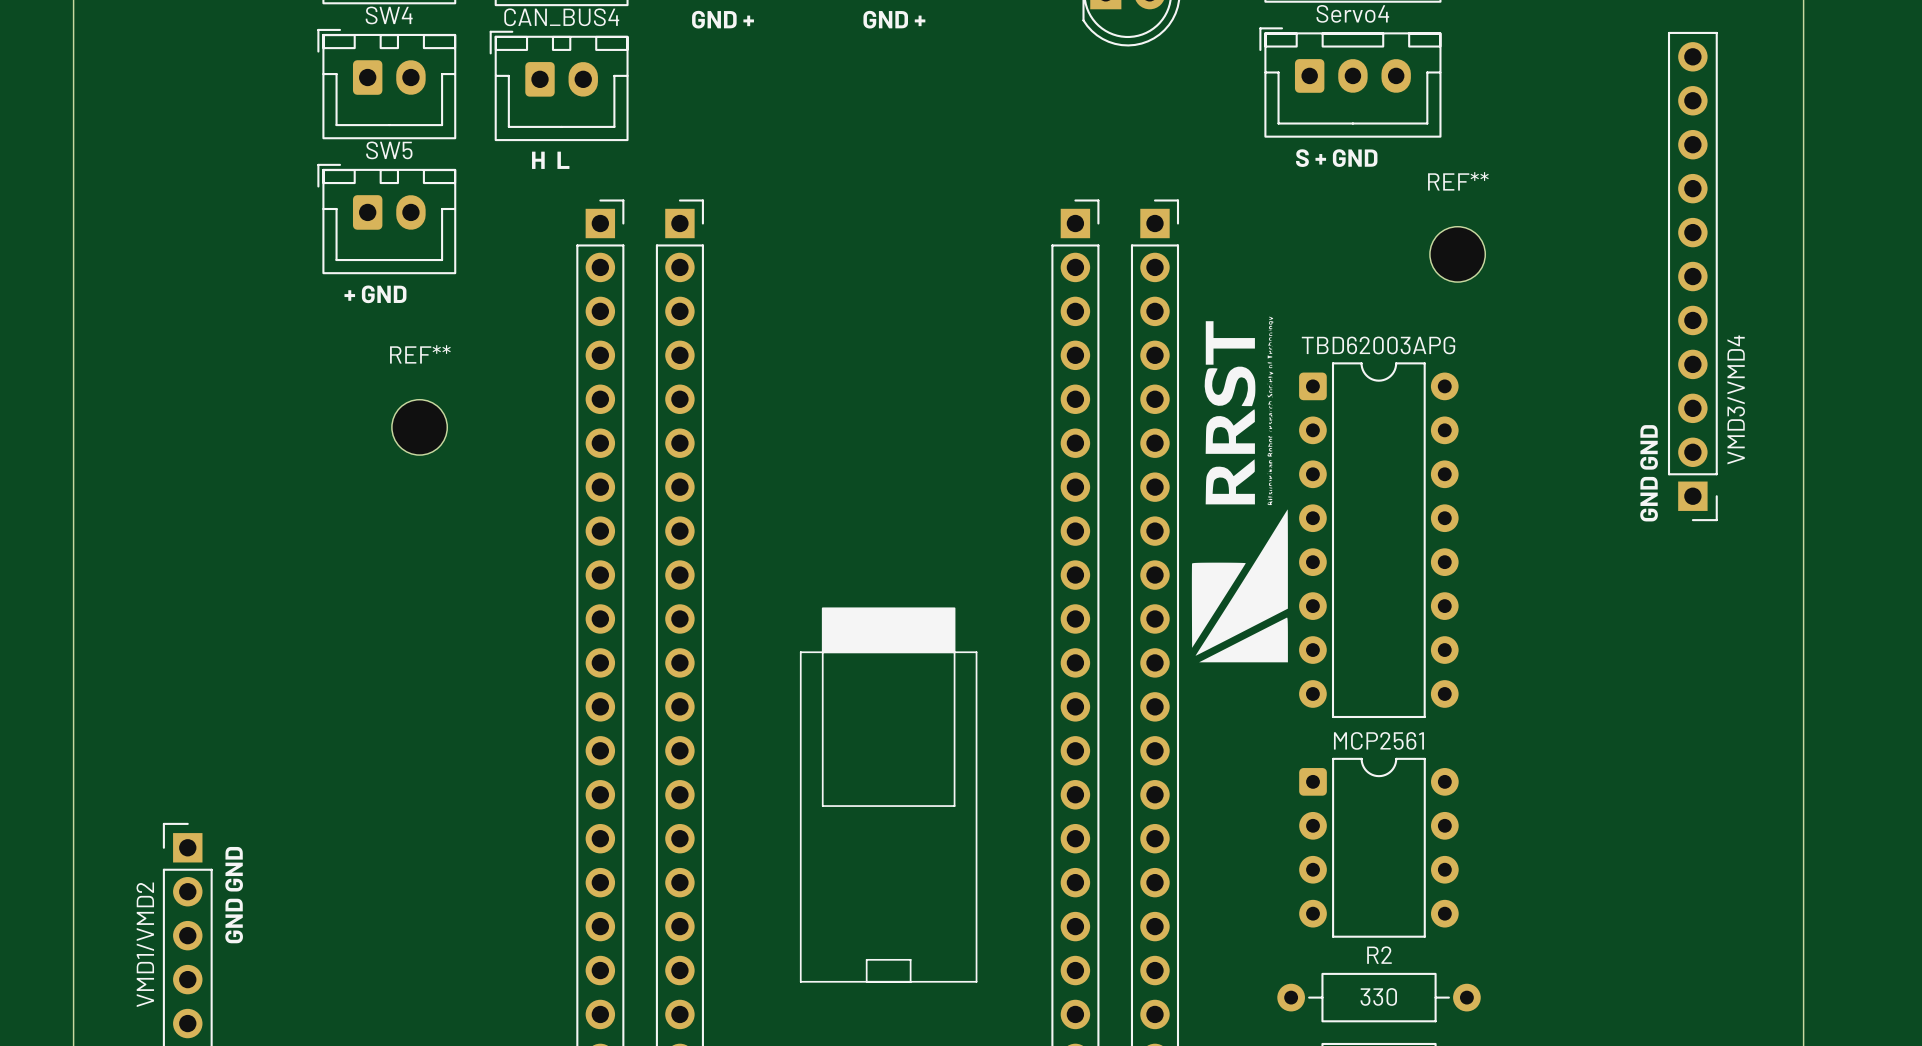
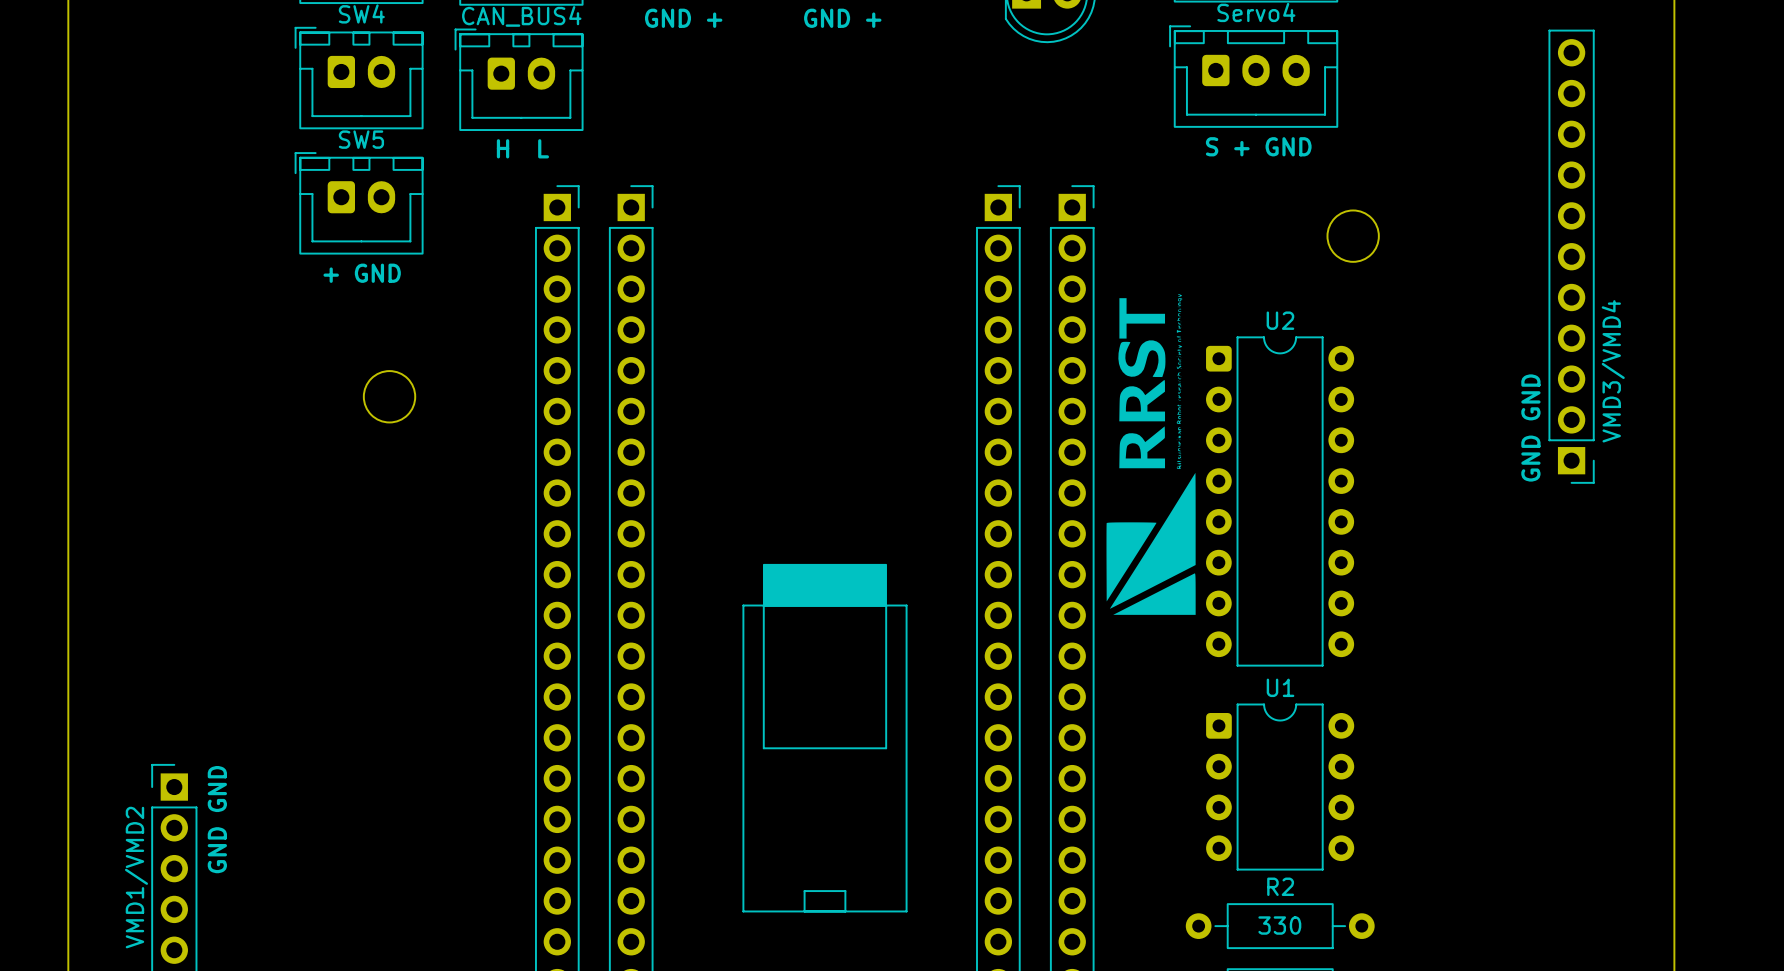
REF** name: REF** (1458, 181) -> none
TBD62003APG name: TBD62003APG (1378, 345) -> U2 (1280, 320)
REF** name: REF** (420, 354) -> none
MCP2561 name: MCP2561 (1378, 740) -> U1 (1280, 687)

